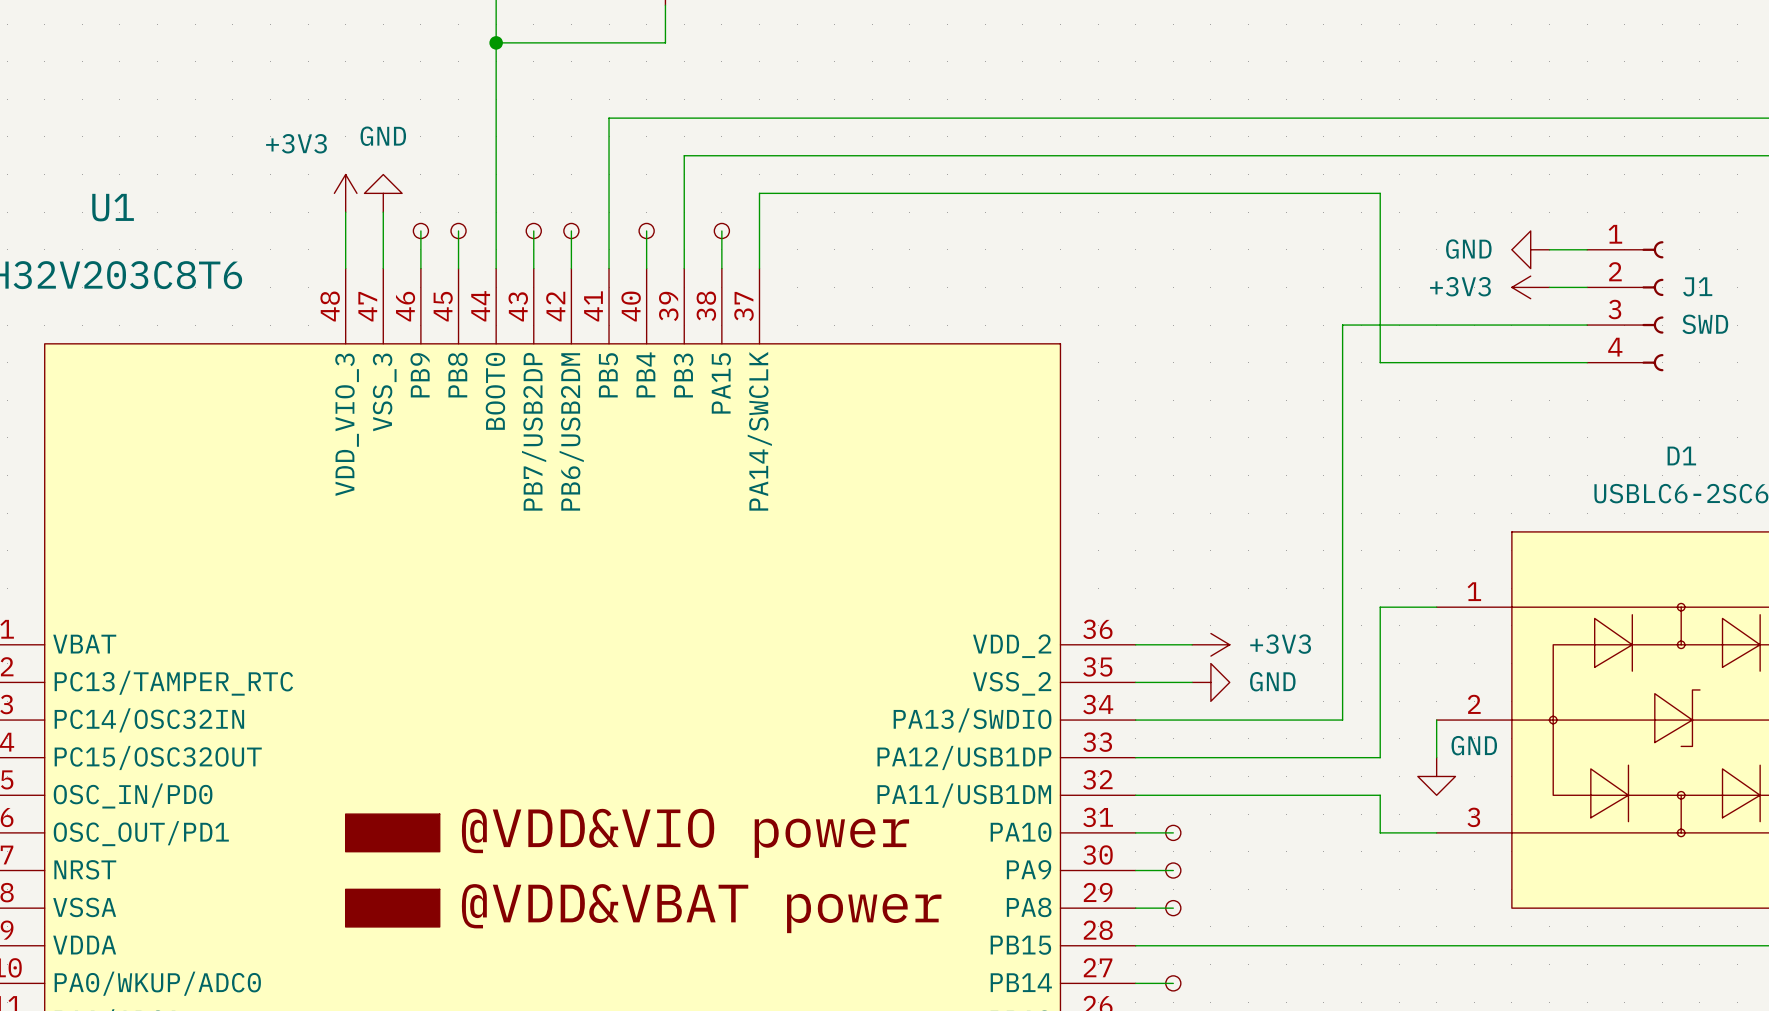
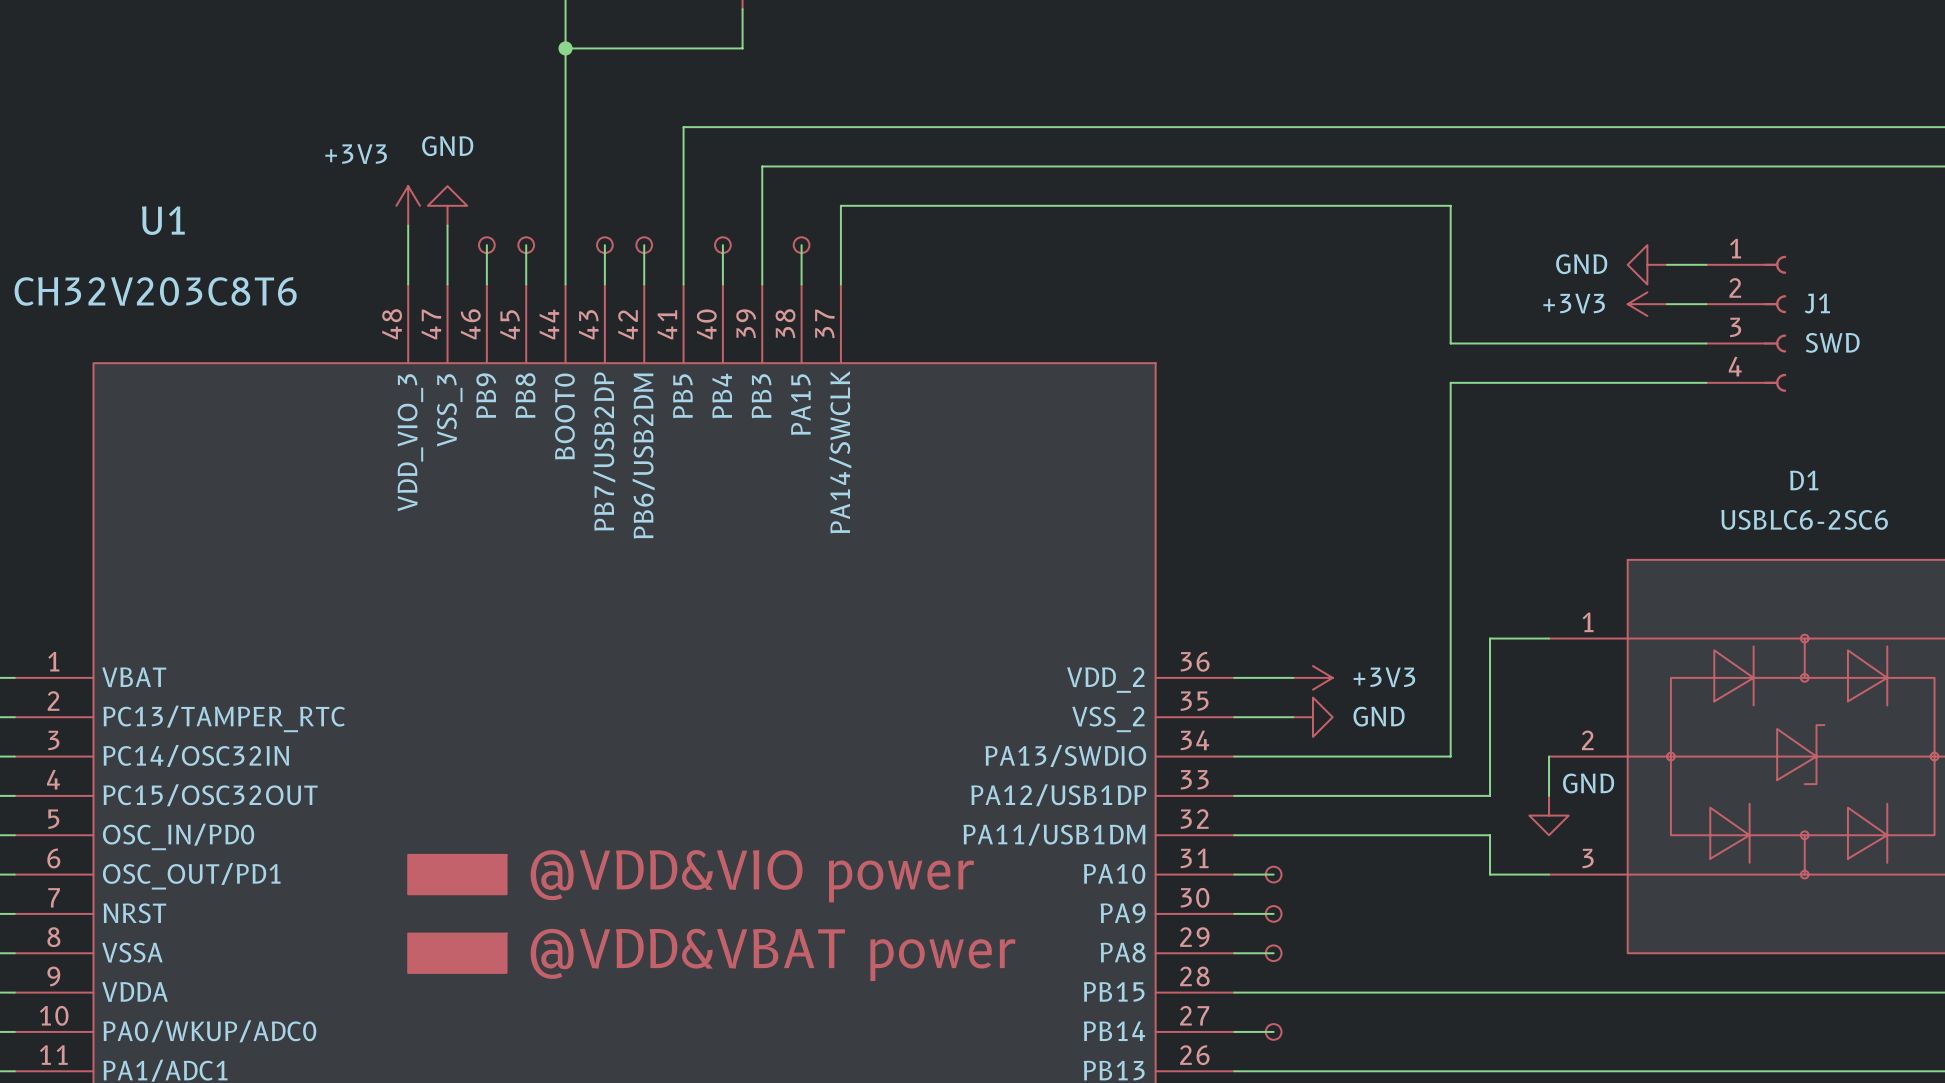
wire: (1342, 193) (1380, 193) (1380, 362) -> (1450, 205) (1450, 343)
wire: (1342, 325) (1342, 362) -> (1490, 382) (1450, 382)

